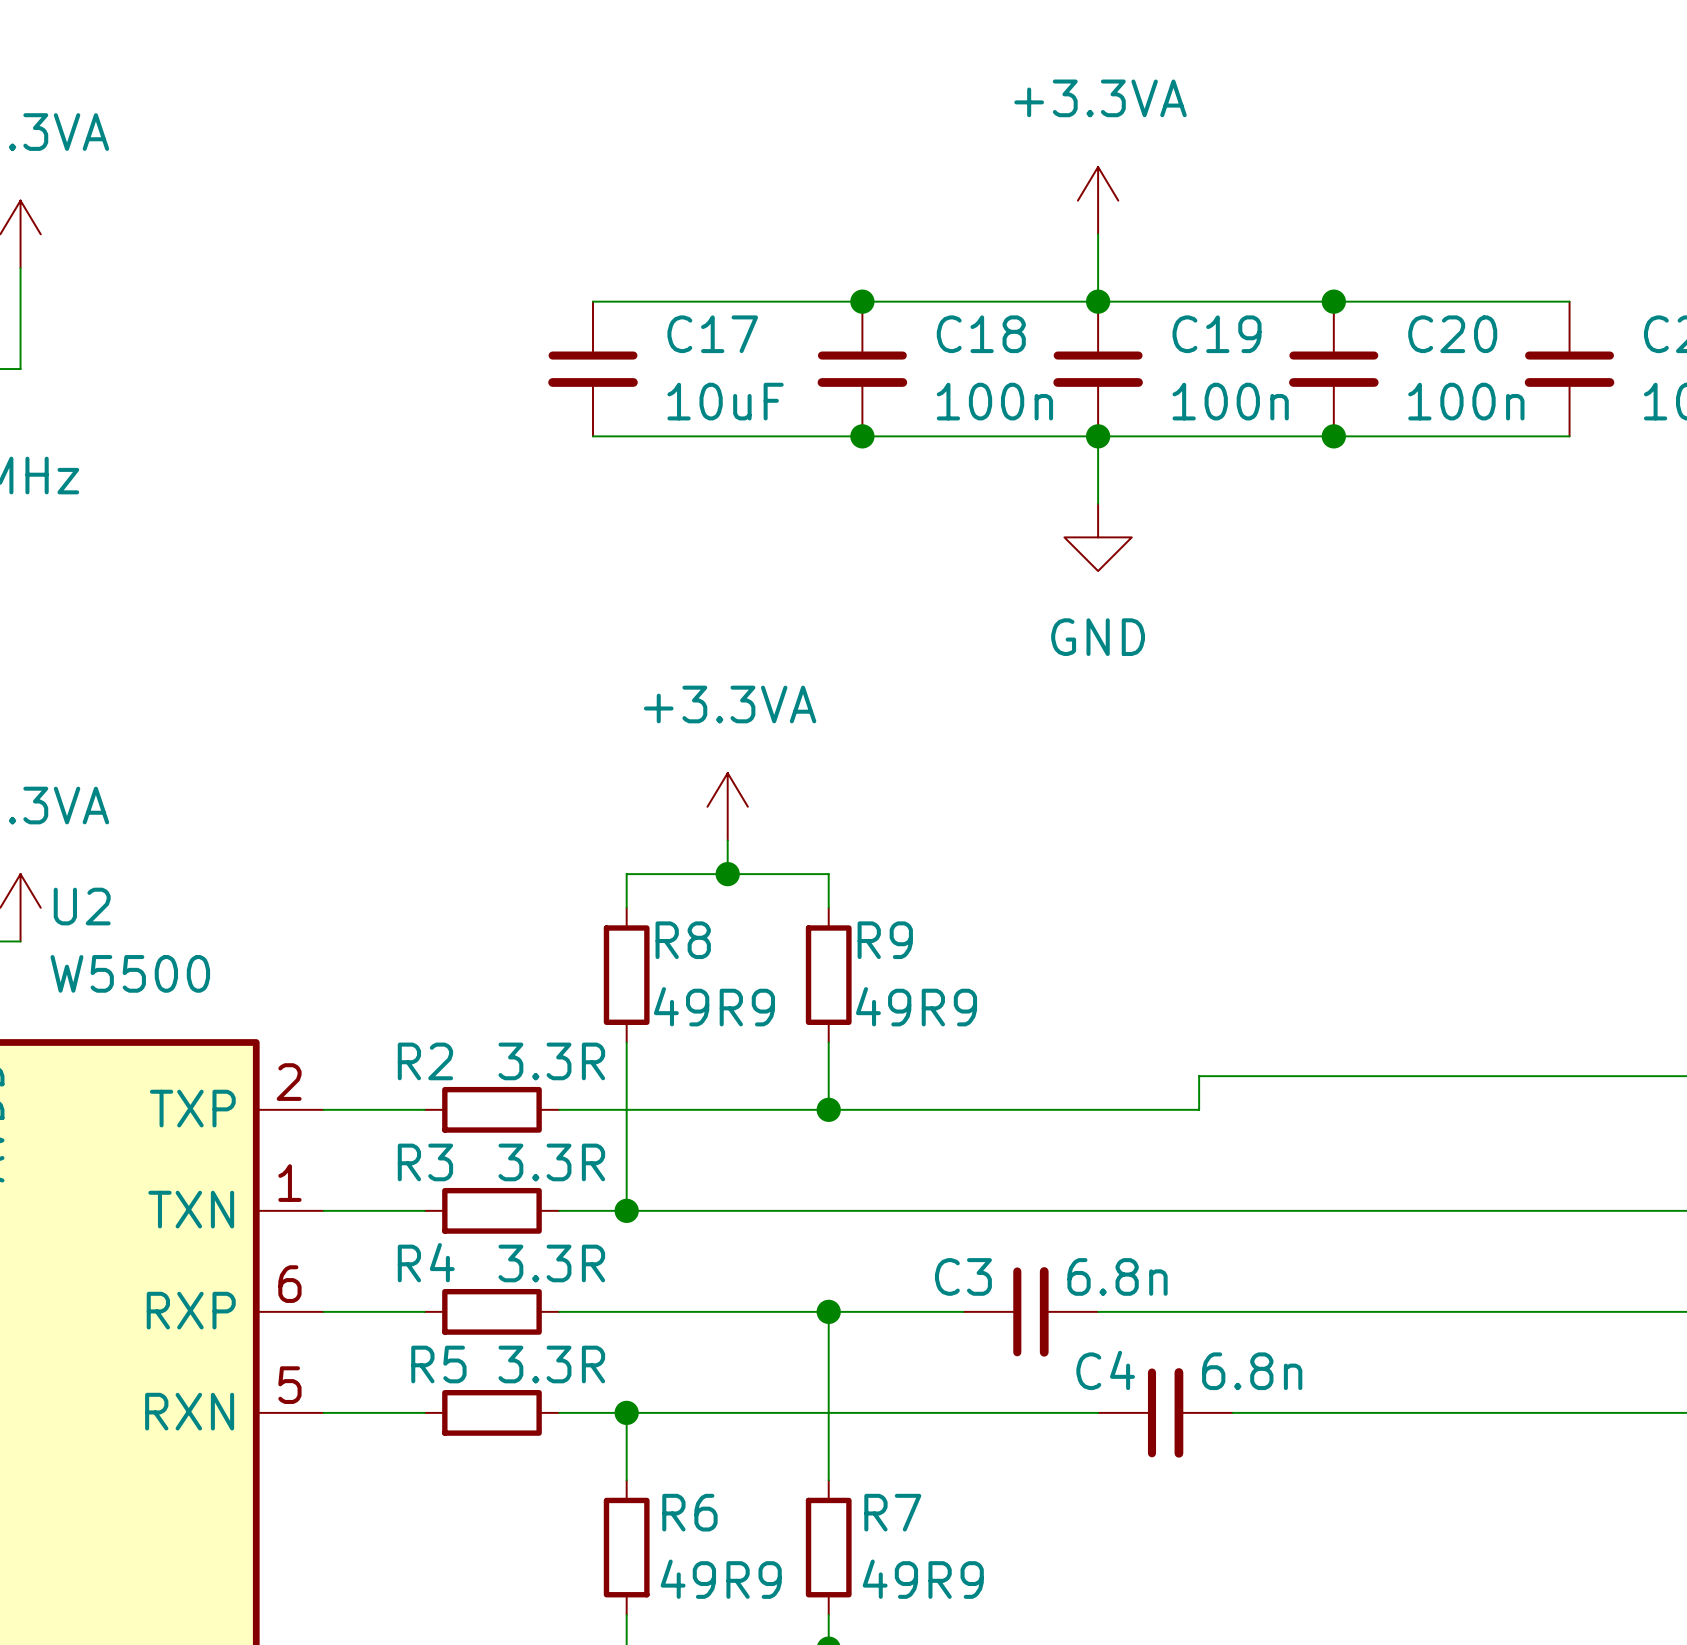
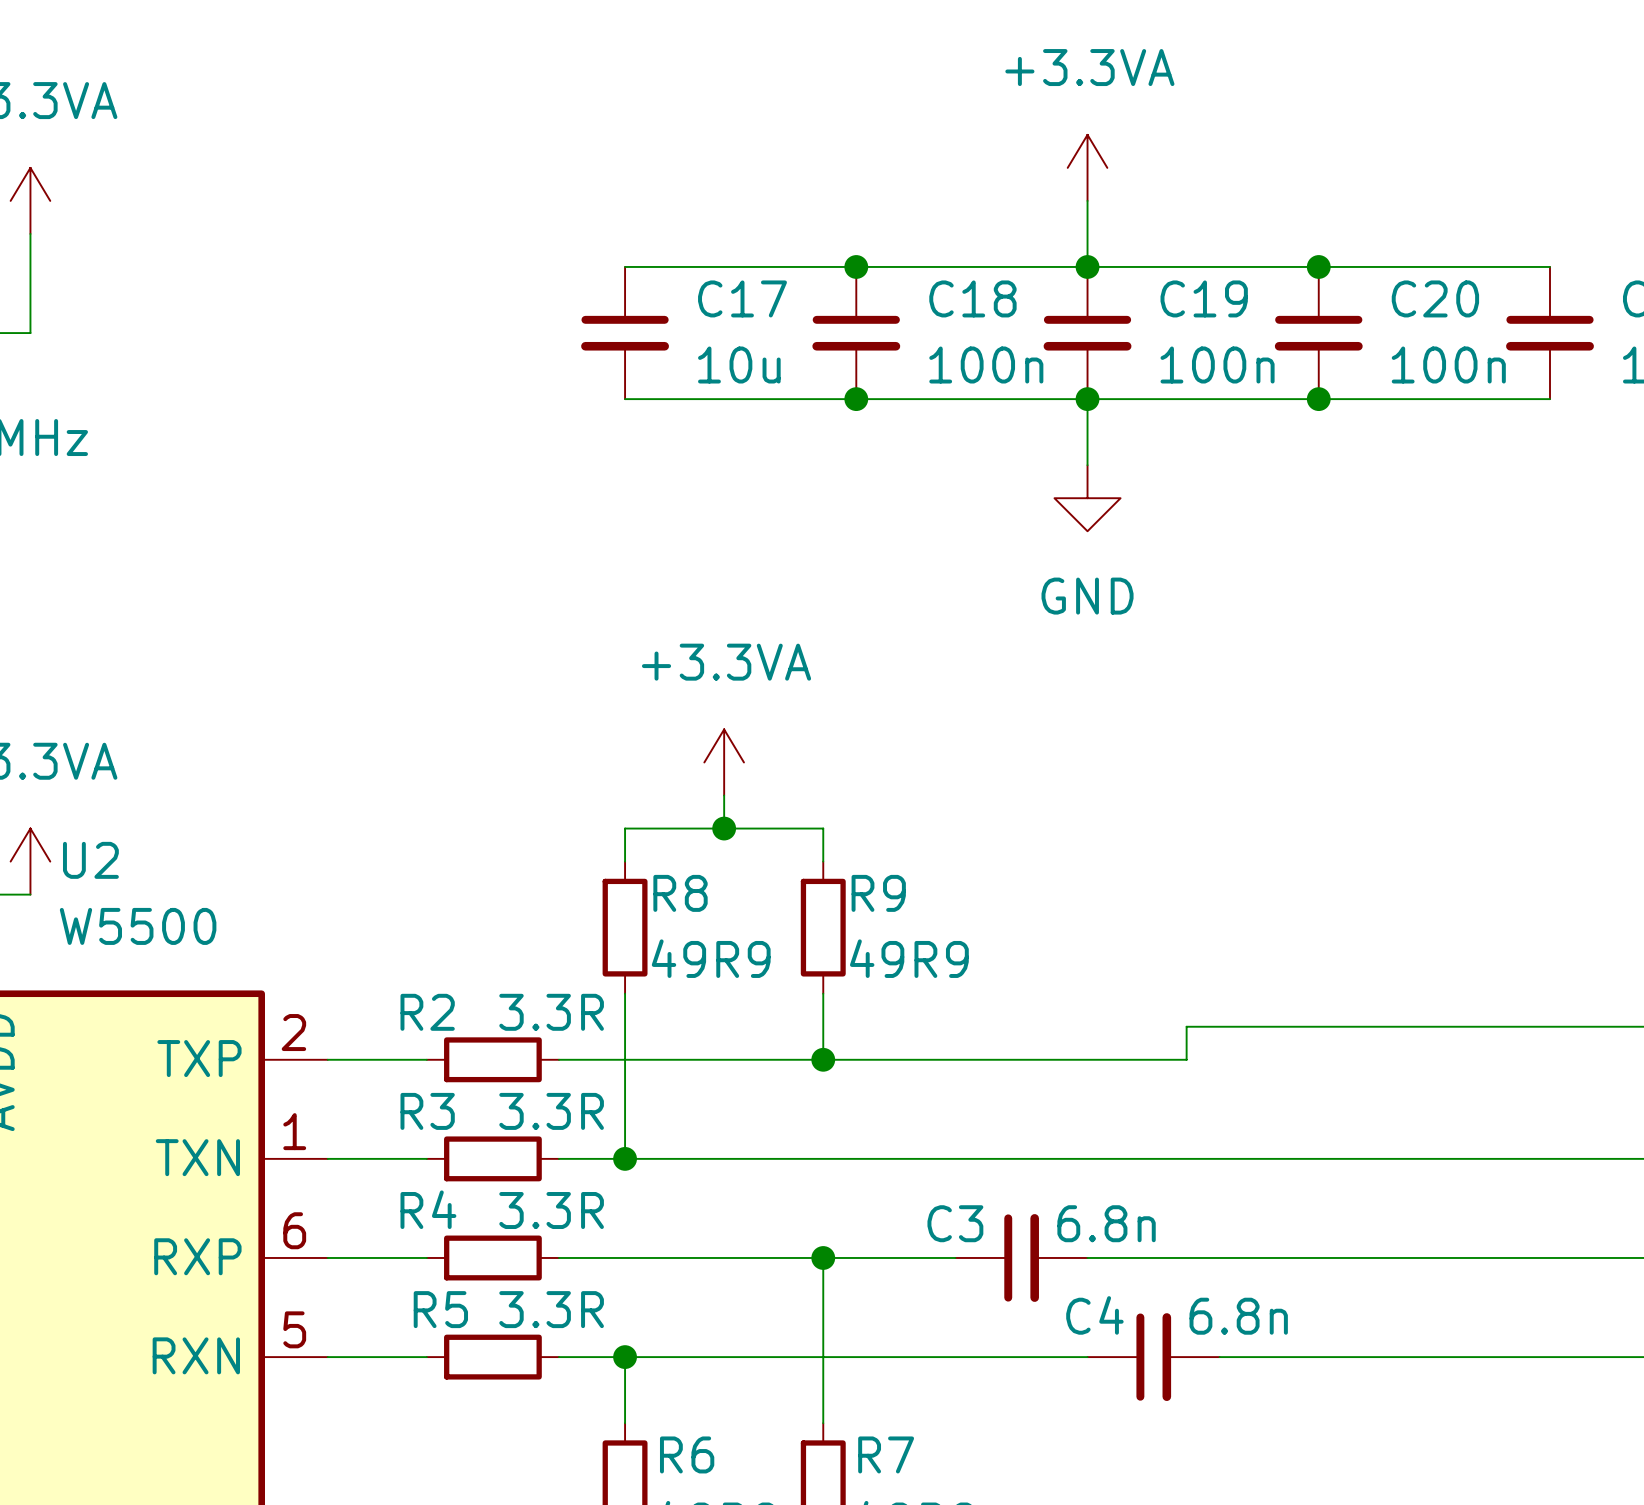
wire: (593, 301) (626, 301) -> none
C17 position: (593, 369) -> (625, 333)
C17 value: 10uF (725, 401) -> 10u (739, 365)
wire: (593, 436) (626, 436) -> none

